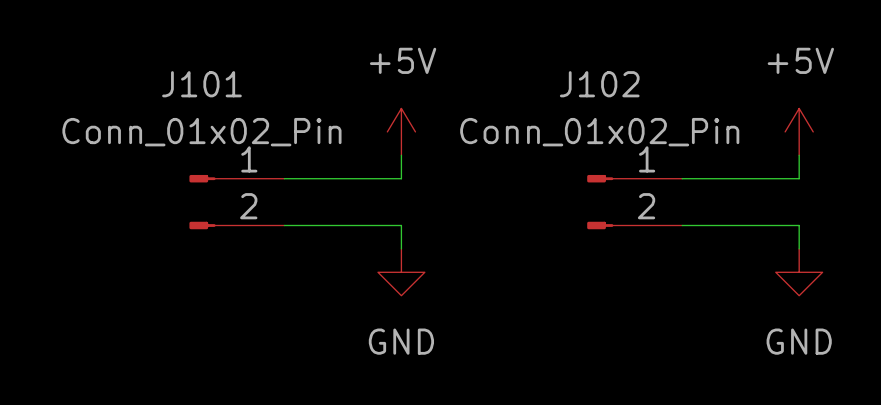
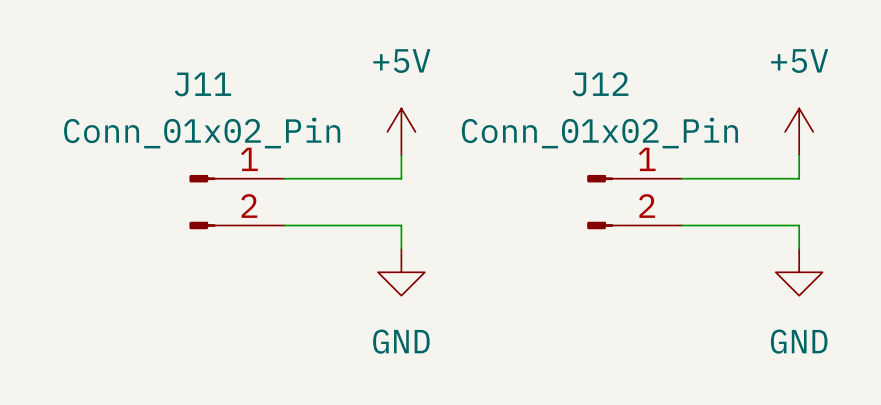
J101 name: J101 (201, 84) -> J11 (202, 84)
J102 name: J102 (599, 84) -> J12 (600, 84)

